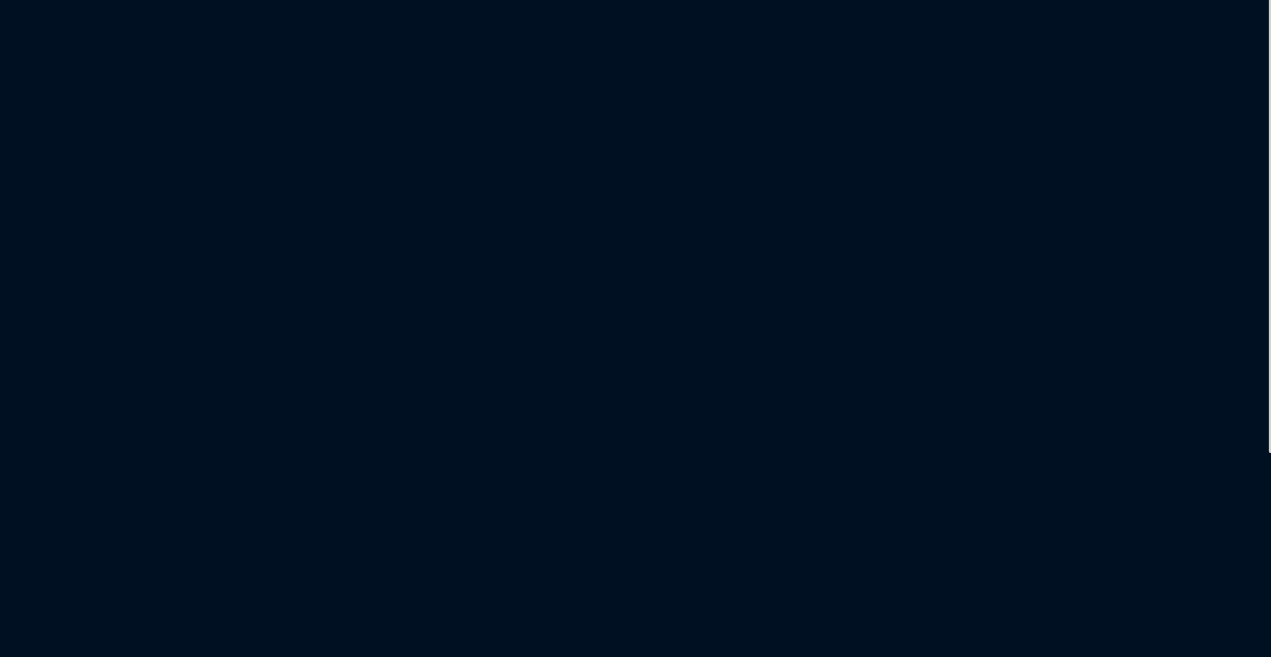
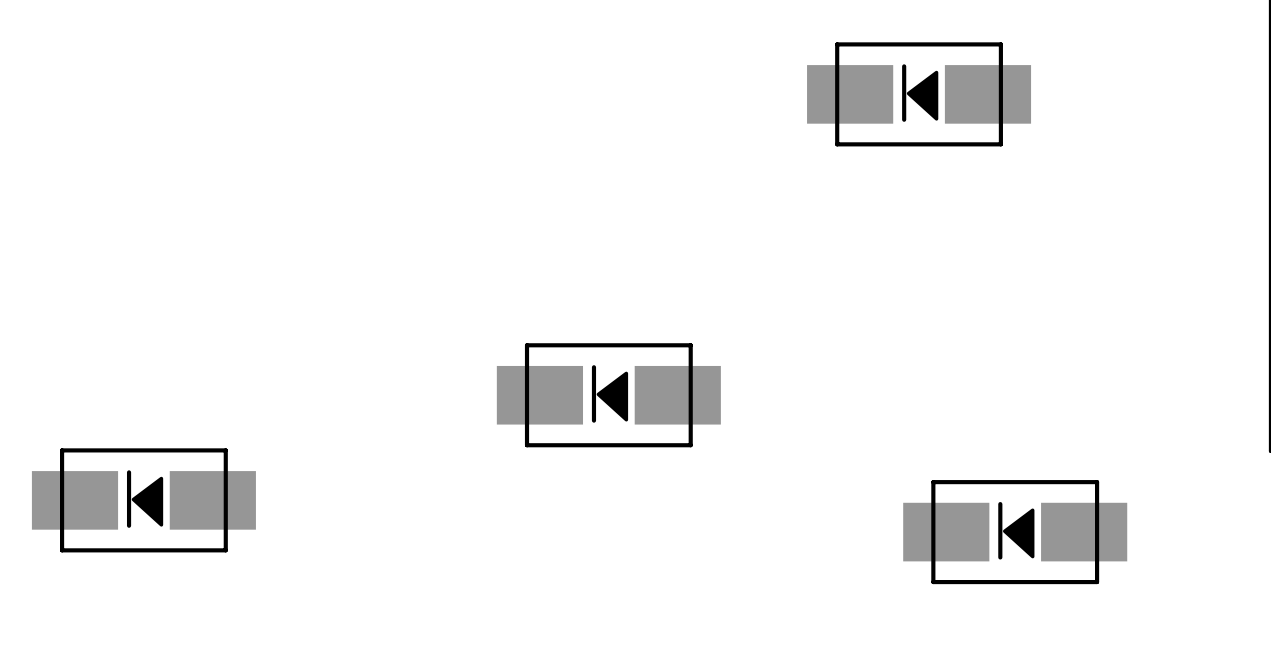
part: none -> (919, 94)
part: none -> (608, 395)
part: none -> (143, 500)
part: none -> (1015, 532)

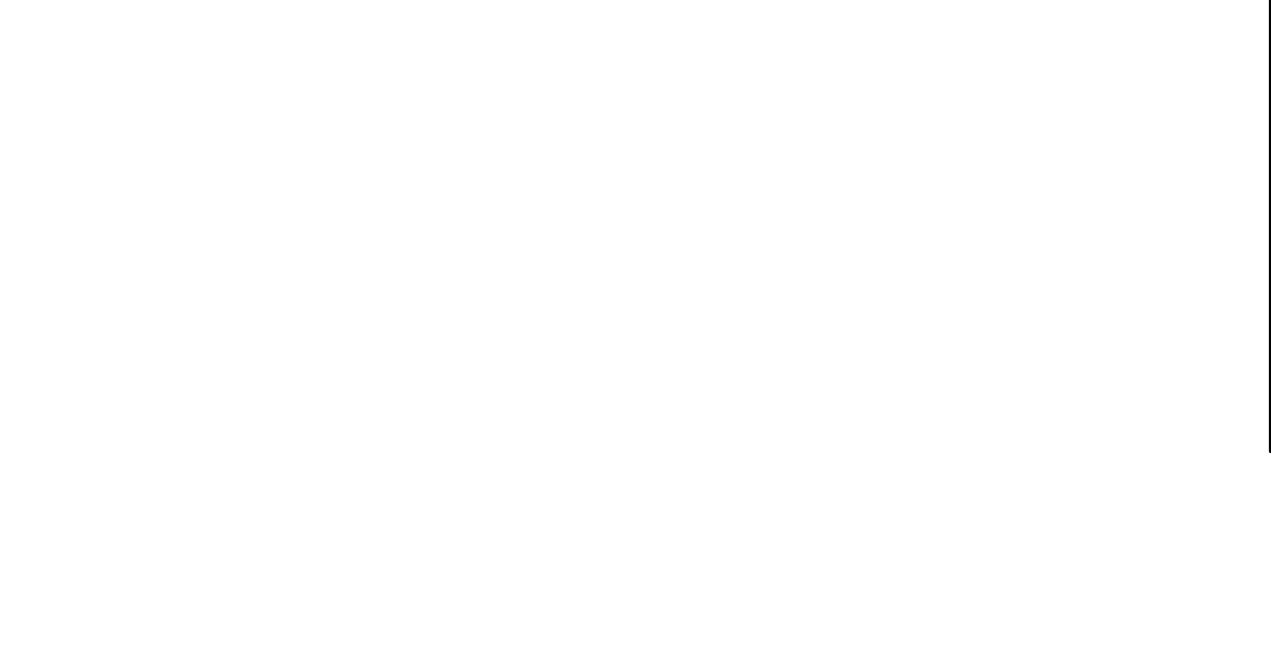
part: (919, 94) -> none
part: (608, 395) -> none
part: (143, 500) -> none
part: (1015, 532) -> none

